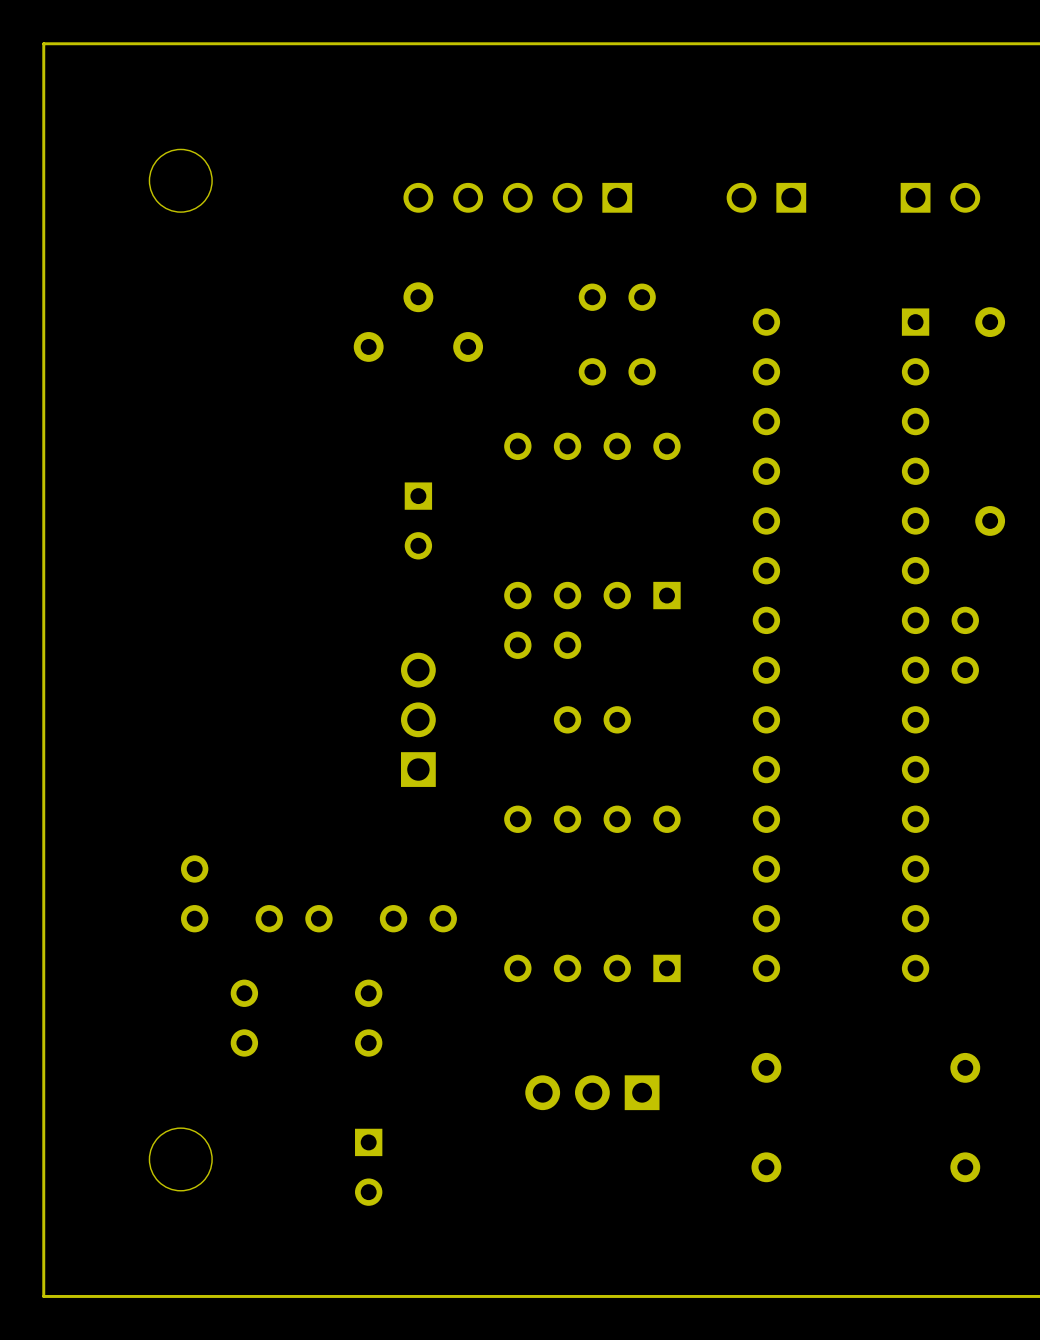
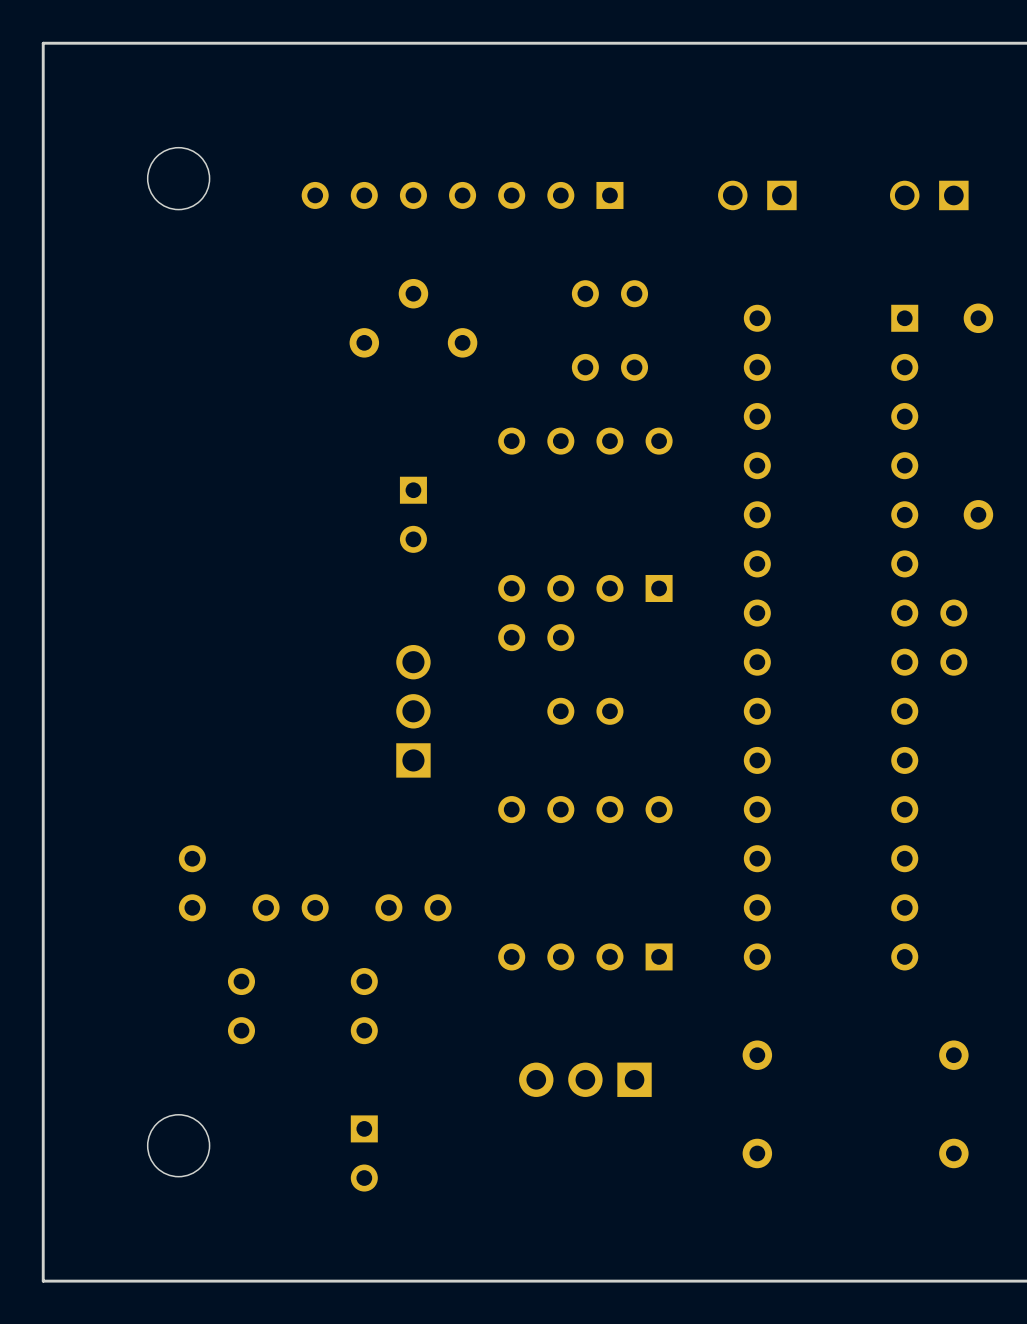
part: none -> (462, 195)
part: (517, 197) -> none
part rotation: 0° (940, 197) -> 180° (929, 195)

